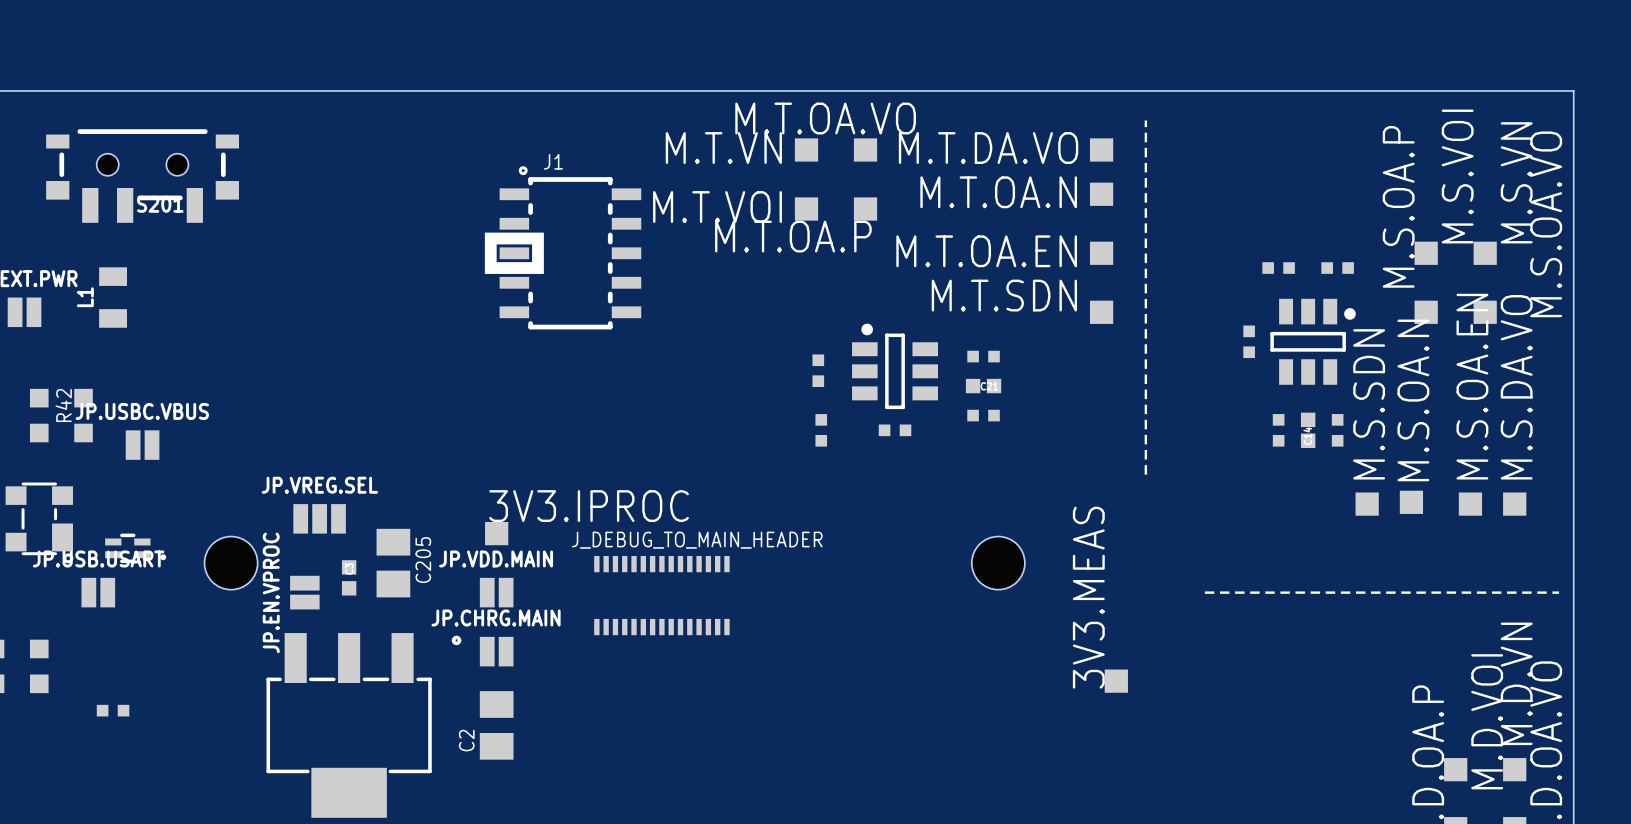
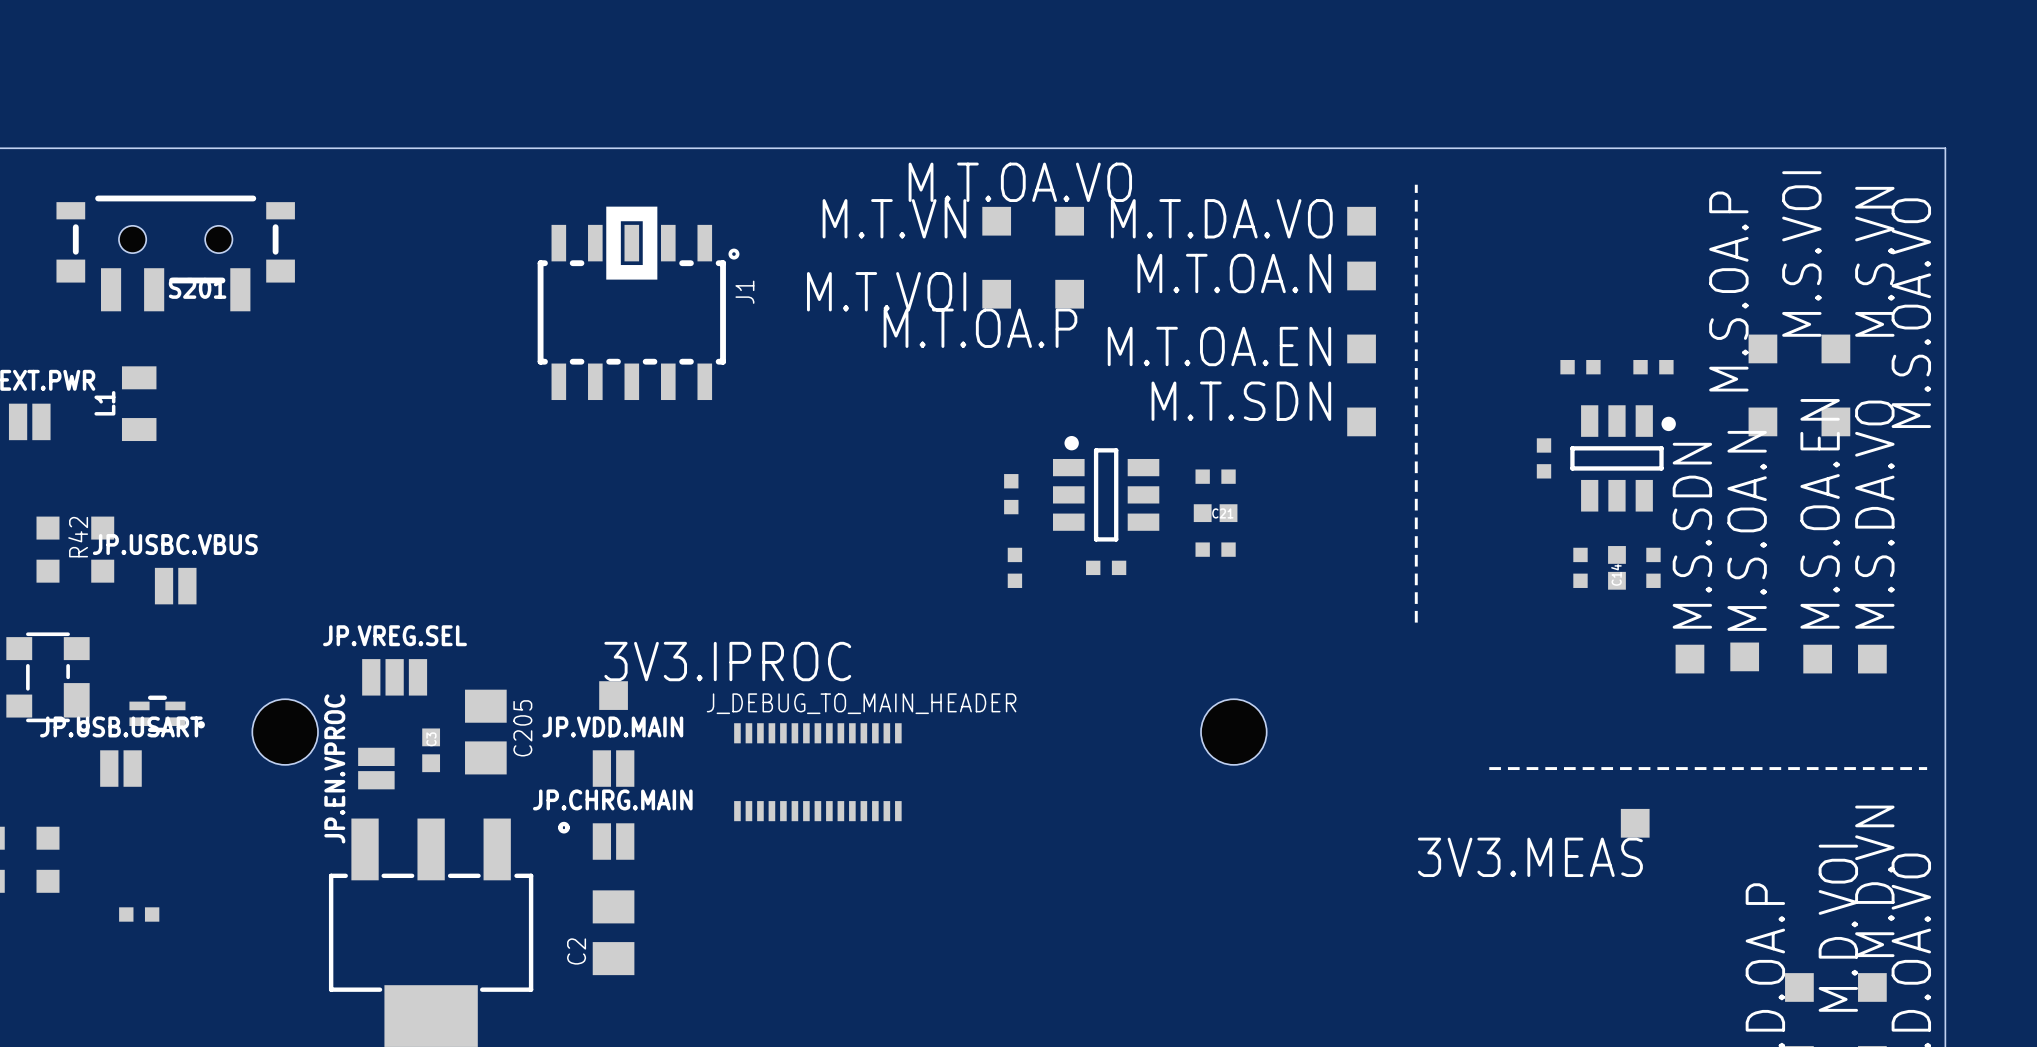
J1 rotation: 0° (563, 247) -> 90° clockwise (638, 303)
3V3.MEAS name rotation: 0° (1088, 597) -> 90° clockwise (1530, 857)
3V3.MEAS position: (1116, 681) -> (1635, 823)

